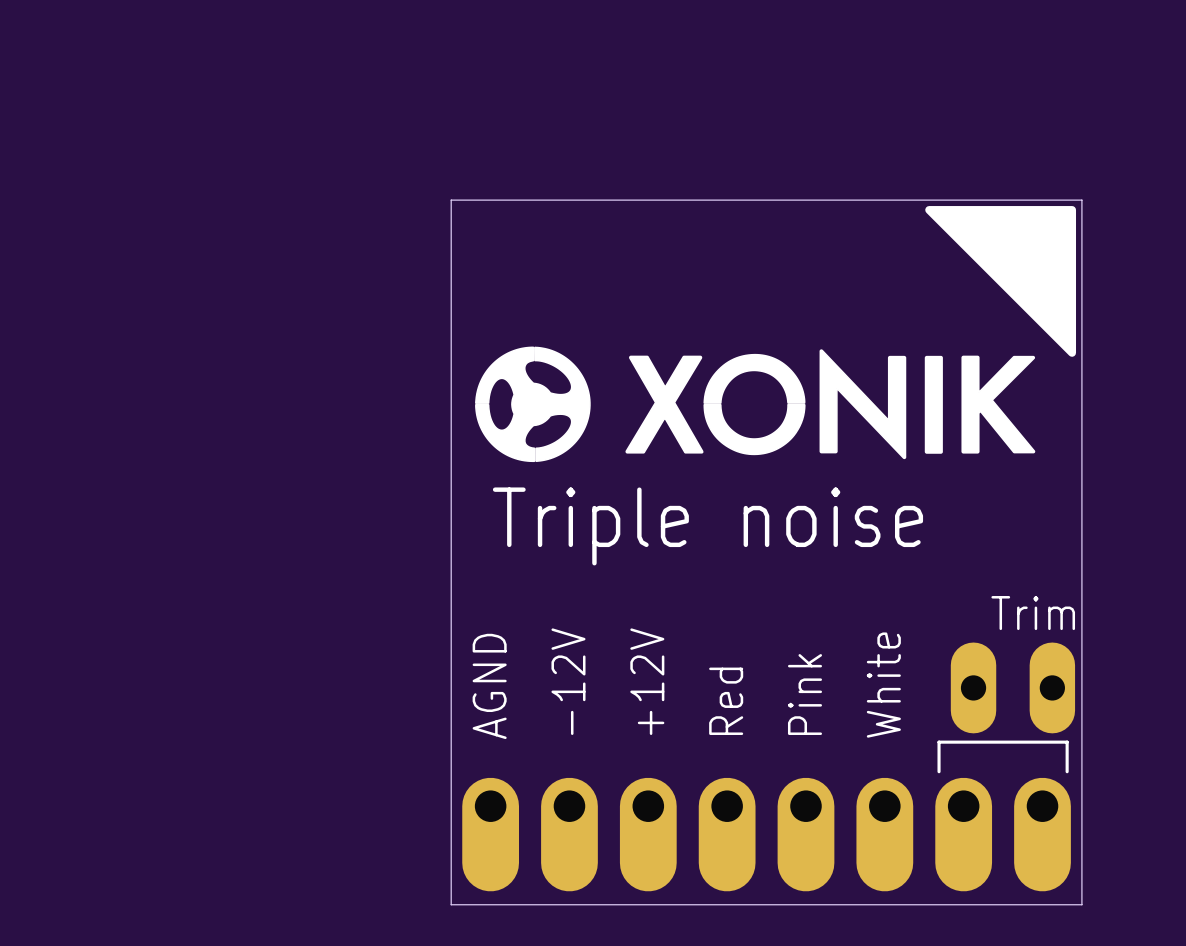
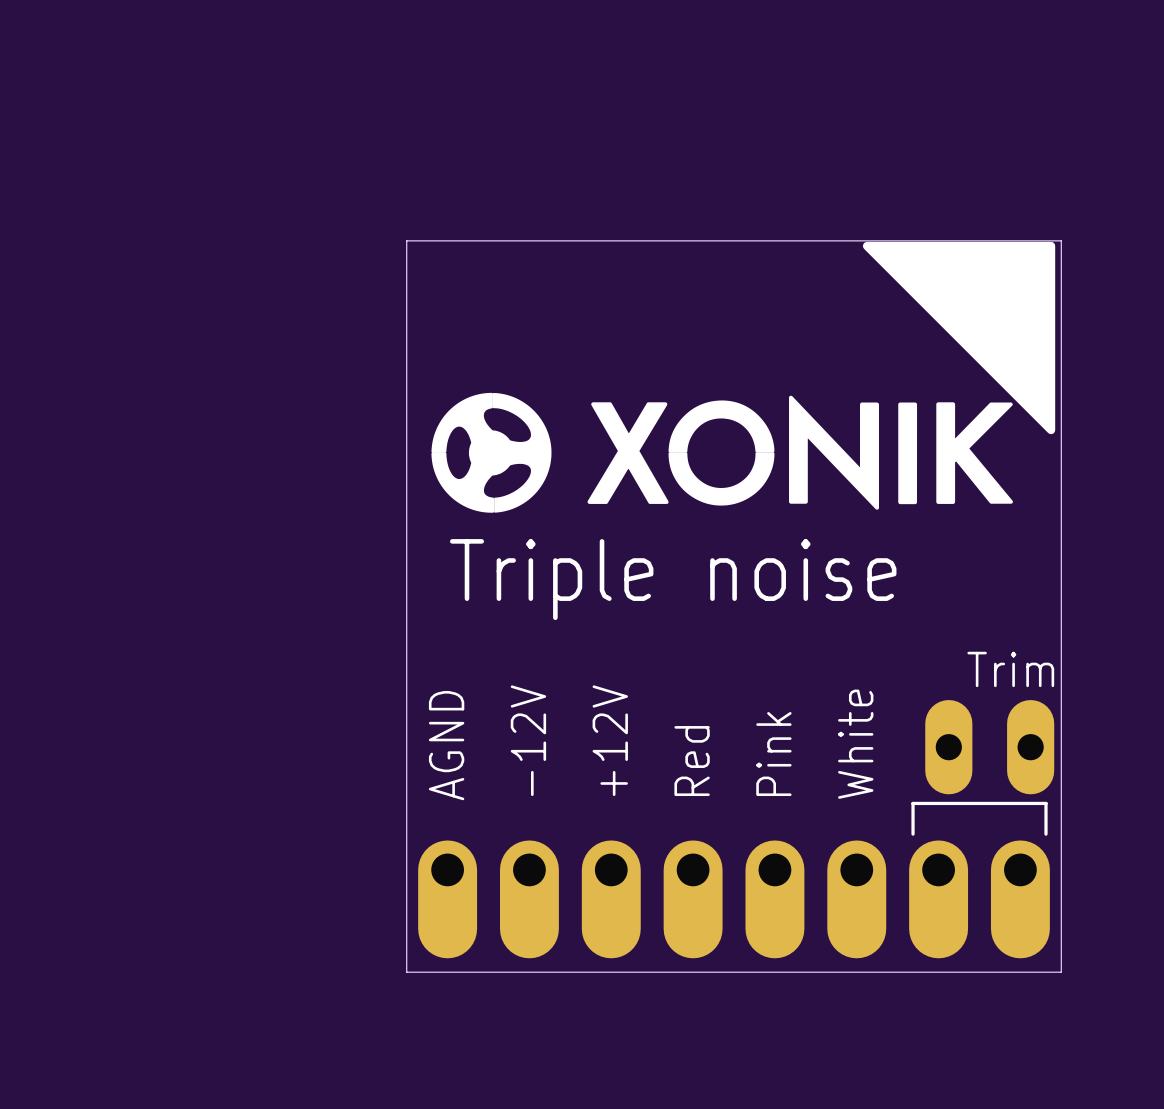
drawing shape: [925, 206, 1077, 357] -> [862, 241, 1056, 435]

